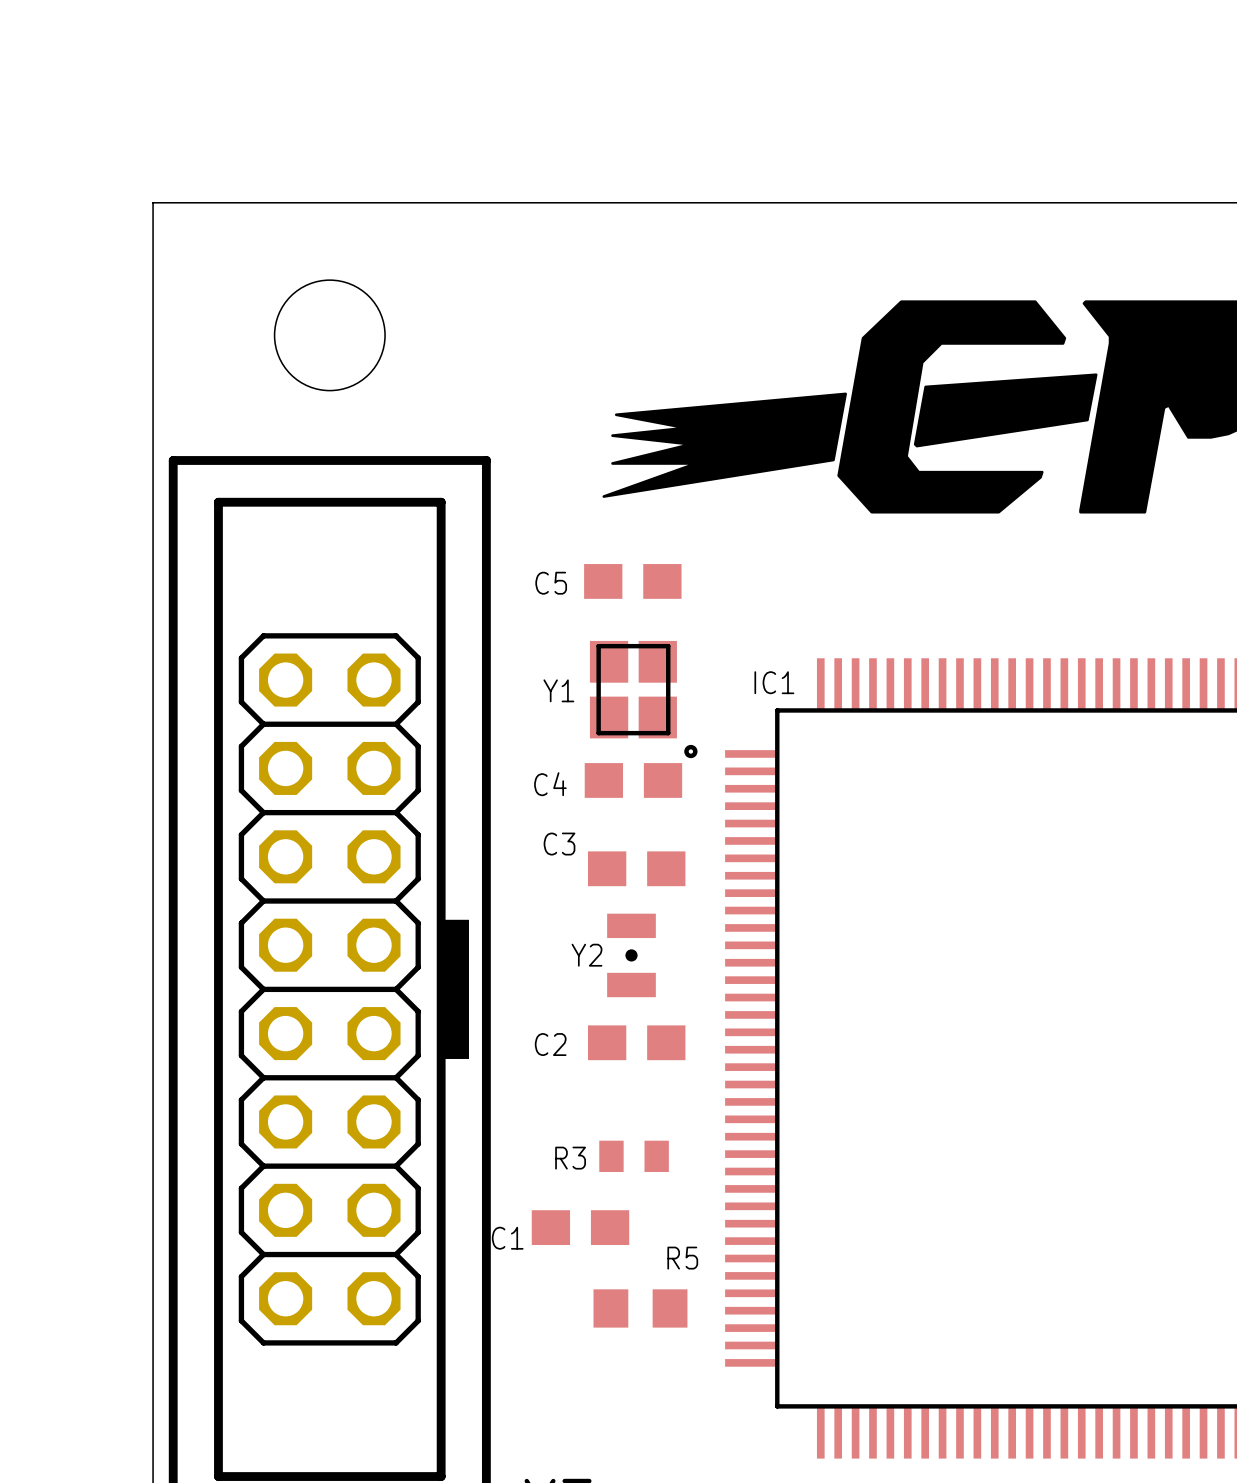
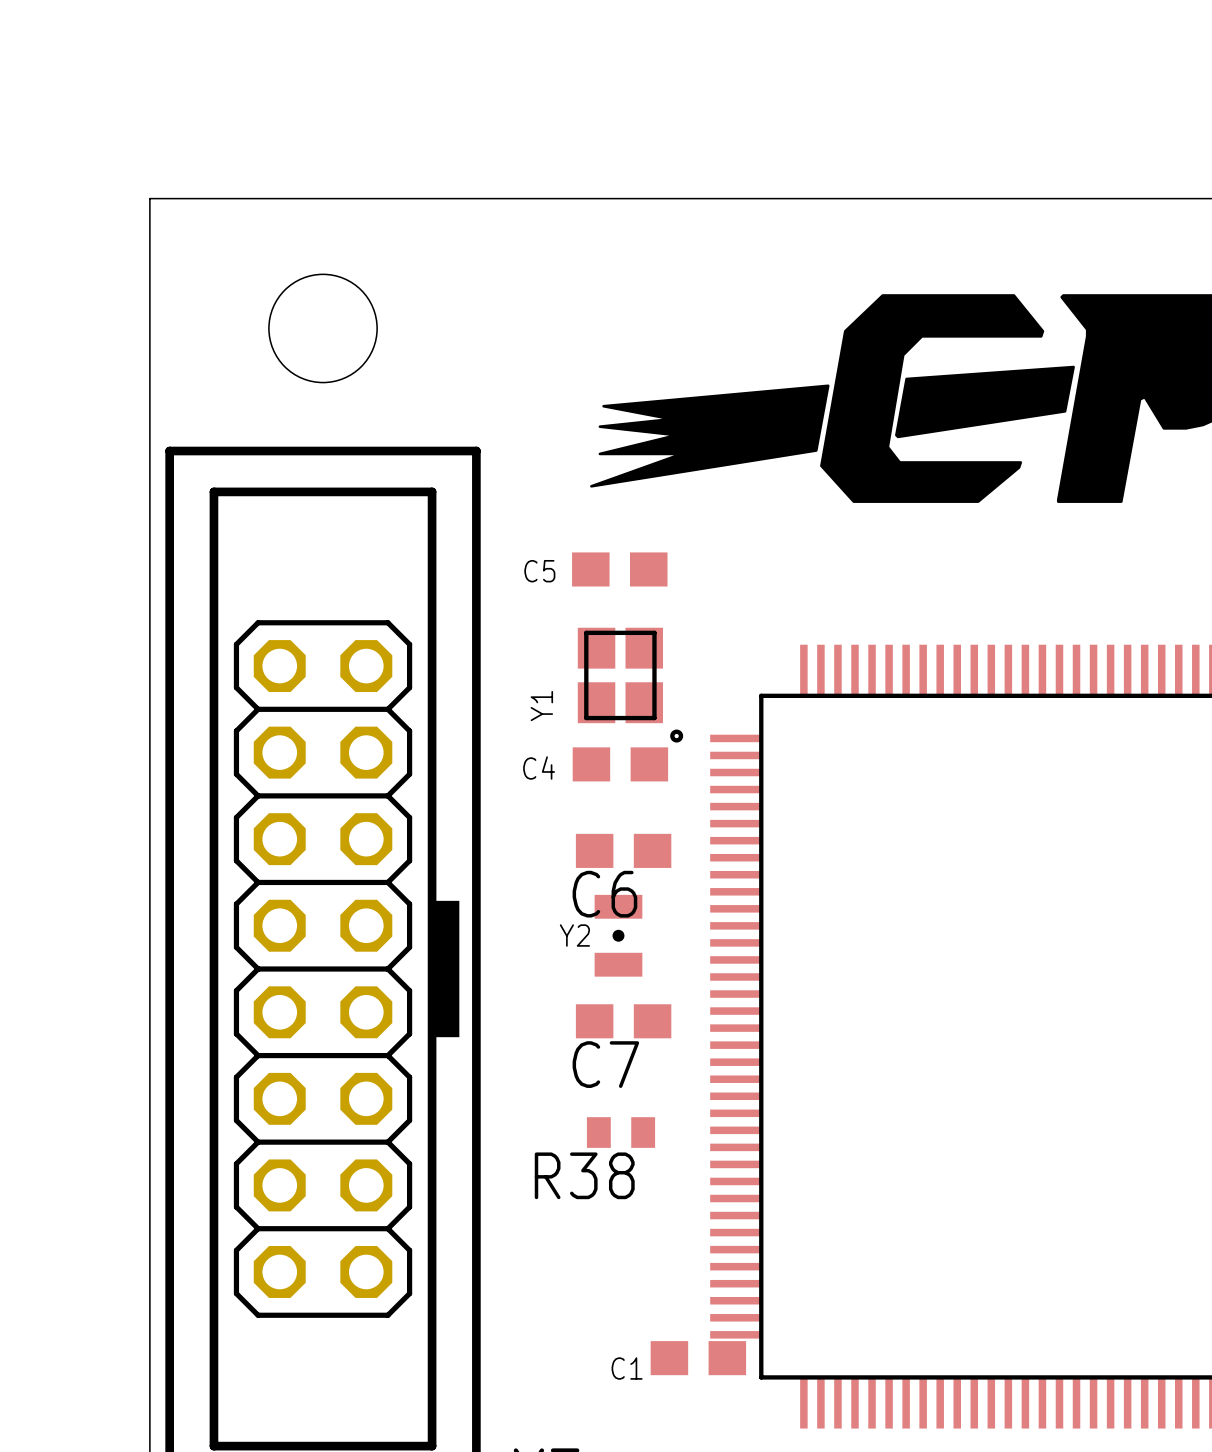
text: IC1 (774, 682) -> none
Y1 name rotation: 0° (558, 690) -> 90° counterclockwise (541, 706)
C3 name: C3 (559, 844) -> C6 (604, 894)
C2 name: C2 (550, 1044) -> C7 (605, 1064)
R3 name: R3 (570, 1158) -> R38 (584, 1175)
C1 position: (580, 1227) -> (698, 1358)
R5: (640, 1308) -> none

